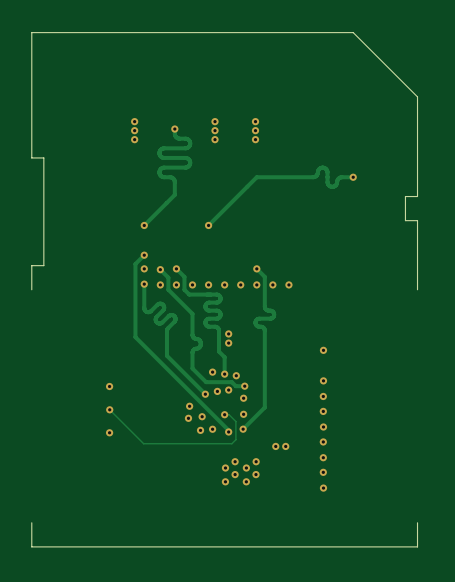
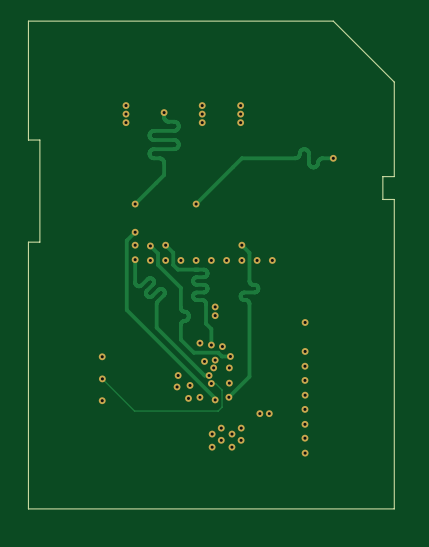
board edge: none -> (28, 265) (28, 486)
board edge: none -> (394, 265) (394, 486)
track: none -> (193, 364) (204, 375) (209, 375)
via: (205, 394) -> none
via: none -> (213, 367)
via: none -> (209, 375)

